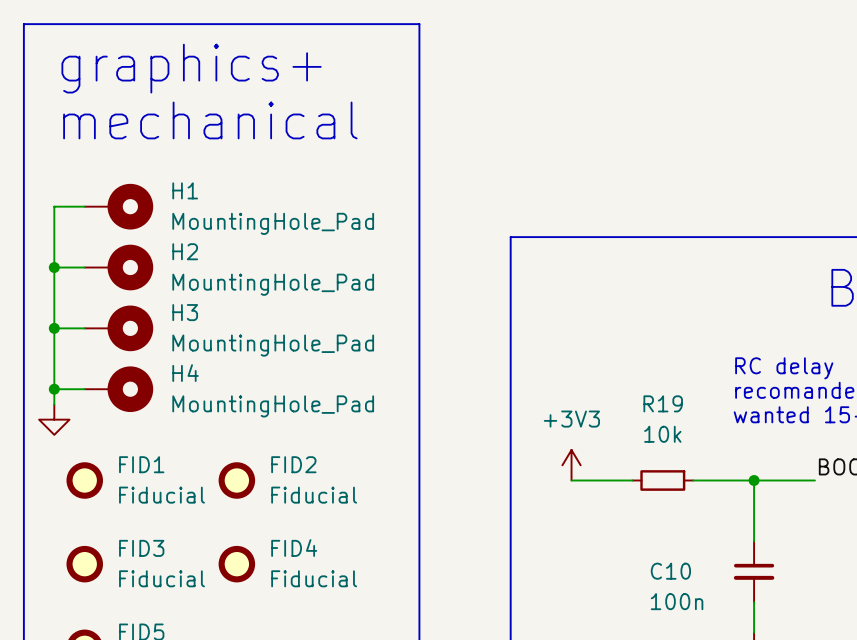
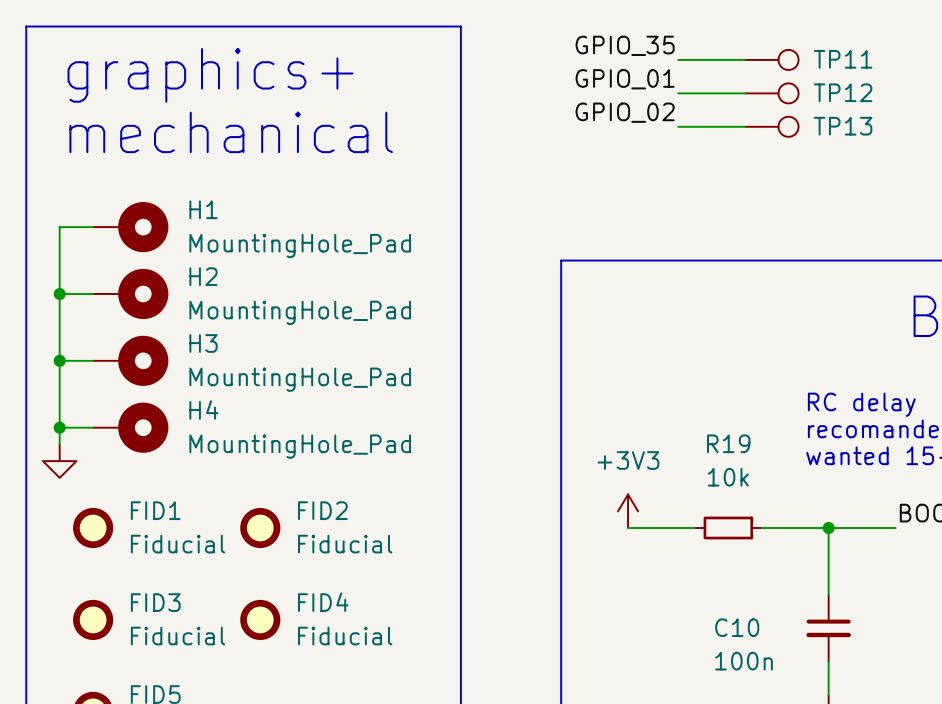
label: none -> GPIO_35 (625, 45)
wire: none -> (678, 59) (745, 59)
TP11: none -> (771, 59)
label: none -> GPIO_01 (625, 79)
wire: none -> (678, 93) (745, 93)
TP12: none -> (771, 93)
label: none -> GPIO_02 (625, 112)
wire: none -> (678, 126) (745, 126)
TP13: none -> (771, 126)

